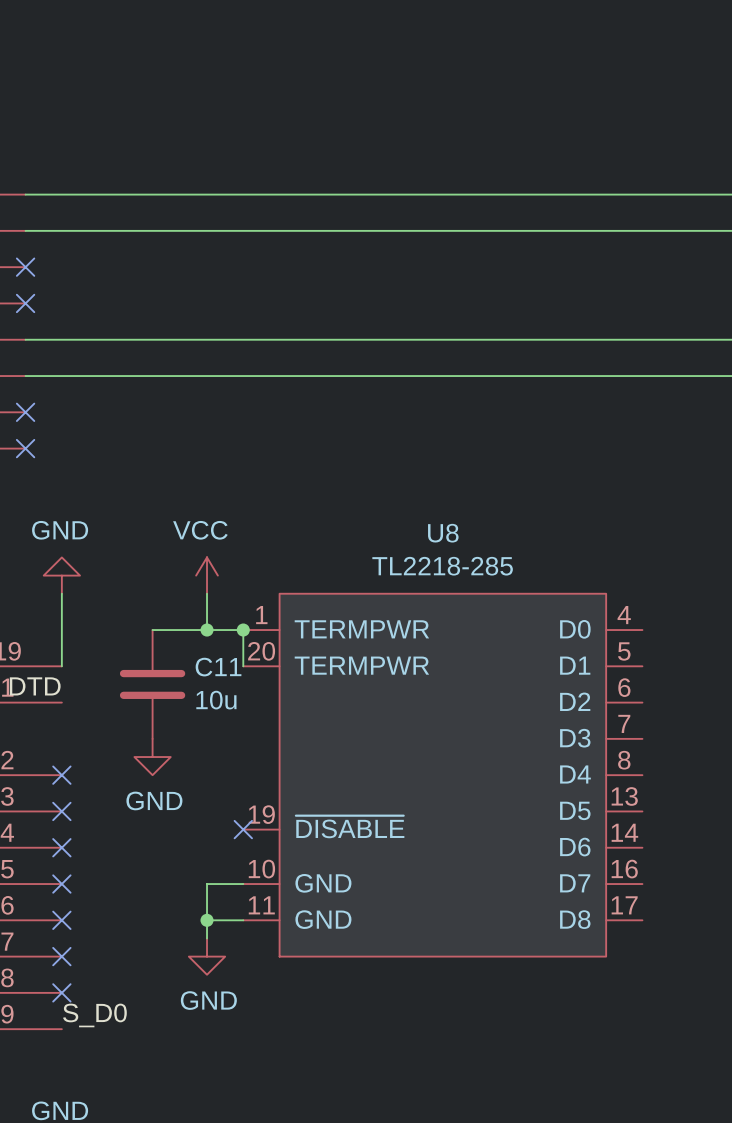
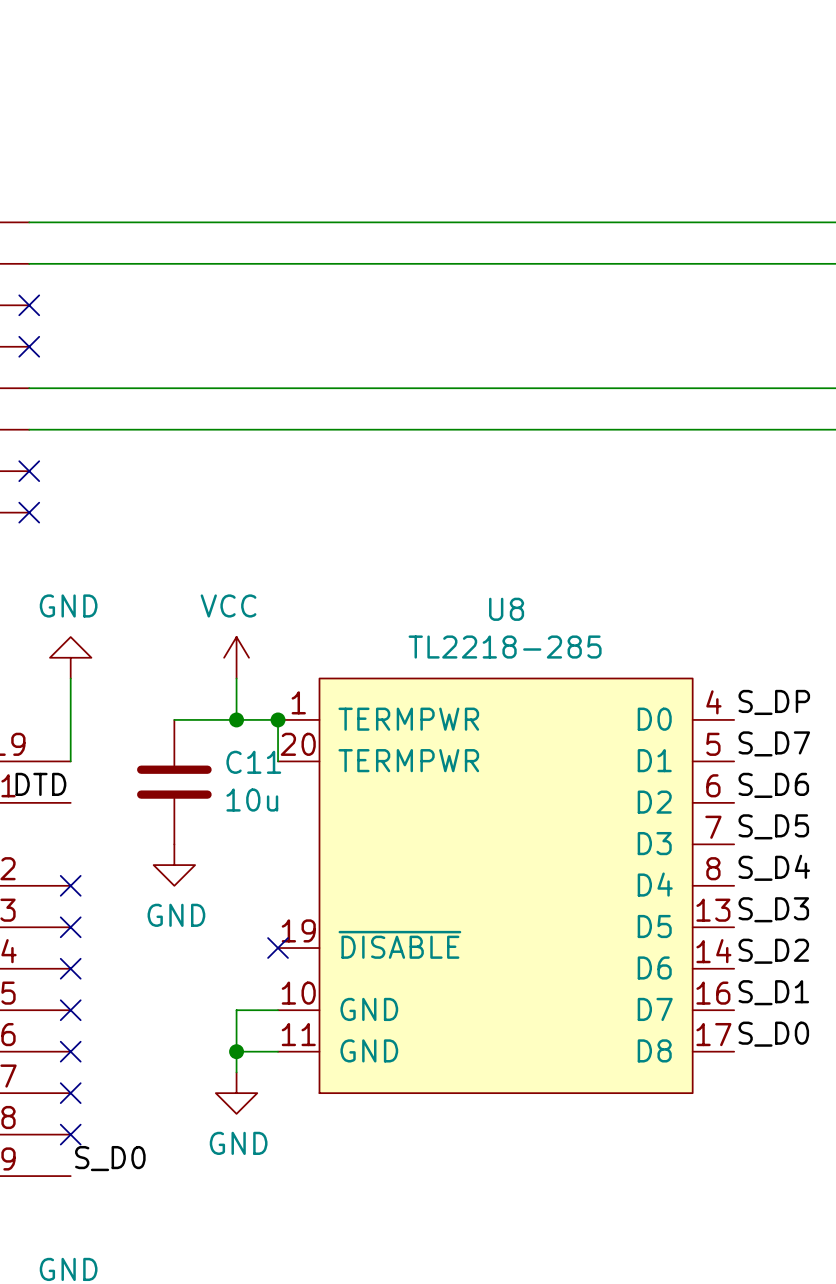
label: none -> S_DP (774, 702)
label: none -> S_D7 (774, 743)
label: none -> S_D6 (773, 785)
label: none -> S_D5 (773, 826)
label: none -> S_D4 (774, 867)
label: none -> S_D3 (773, 909)
label: none -> S_D2 (773, 951)
label: none -> S_D1 (773, 992)
label: none -> S_D0 (773, 1034)

